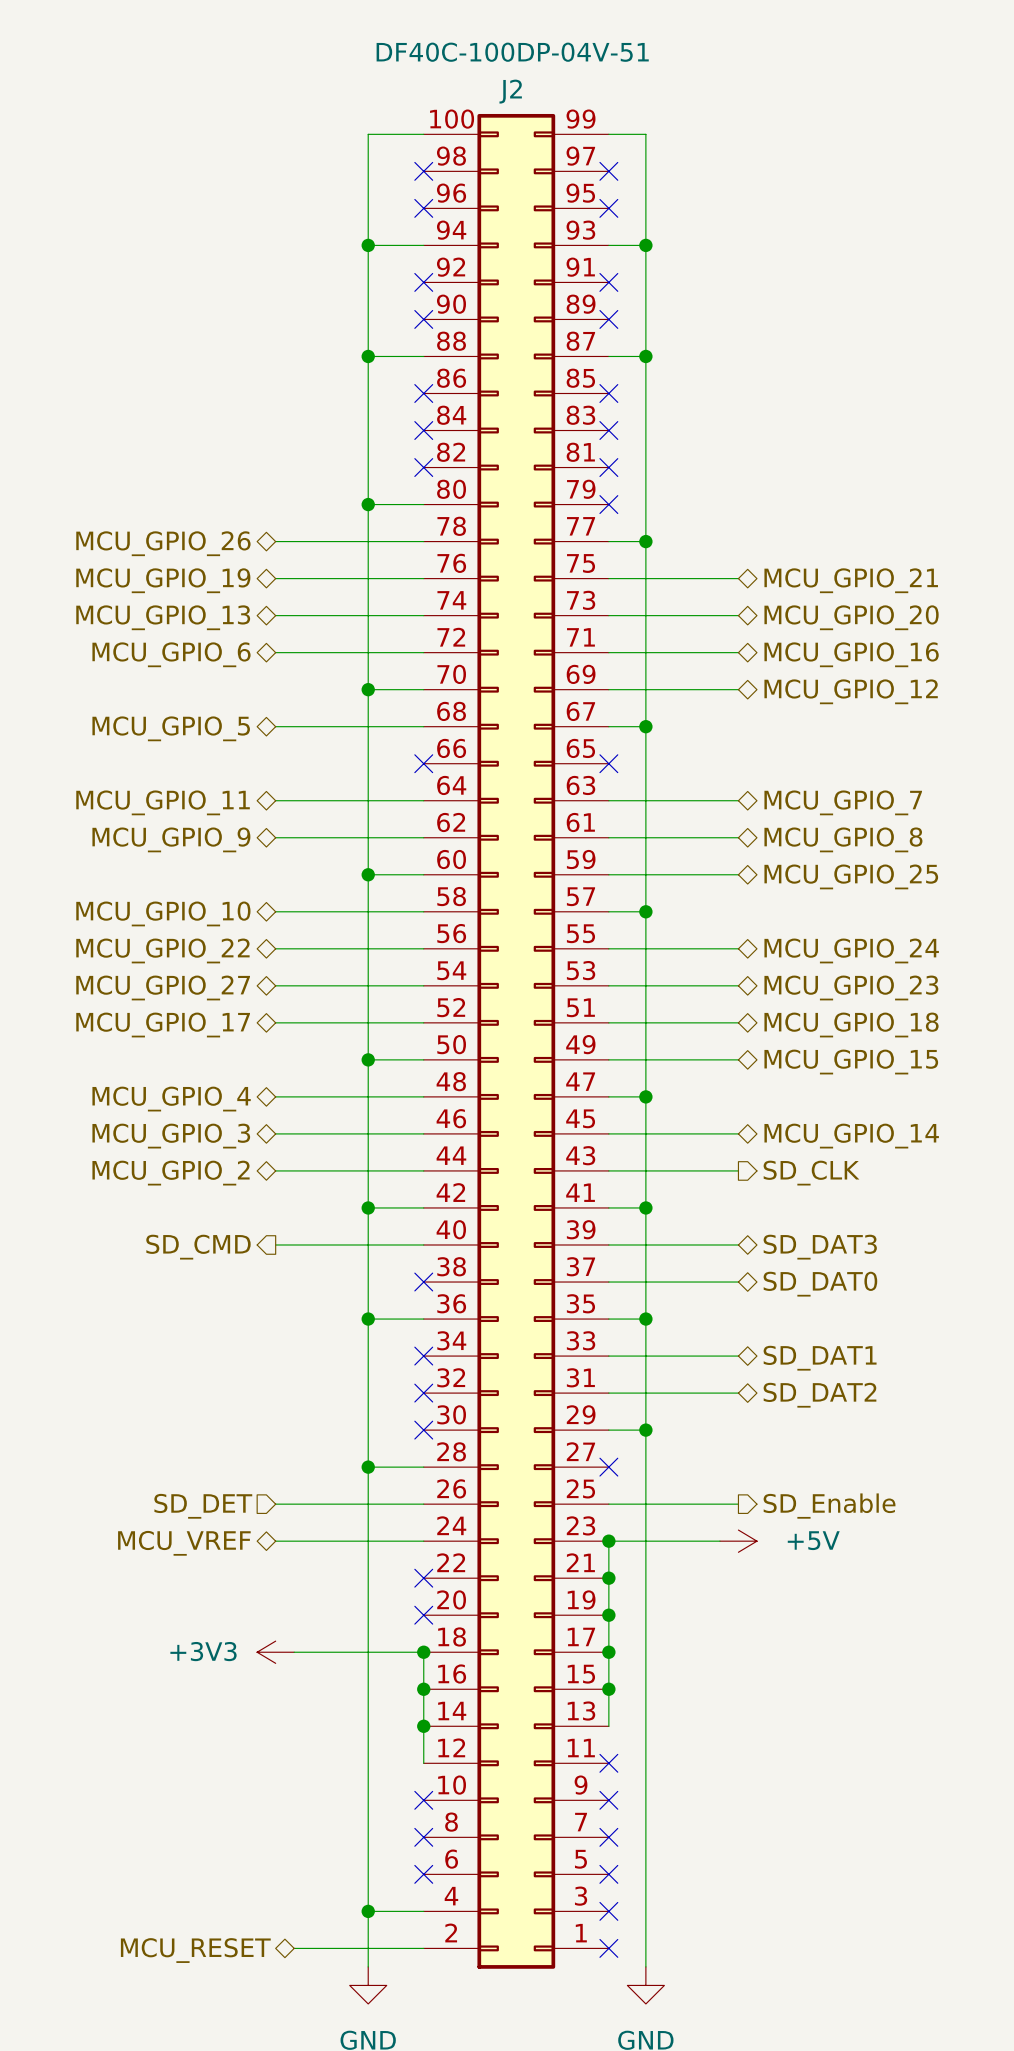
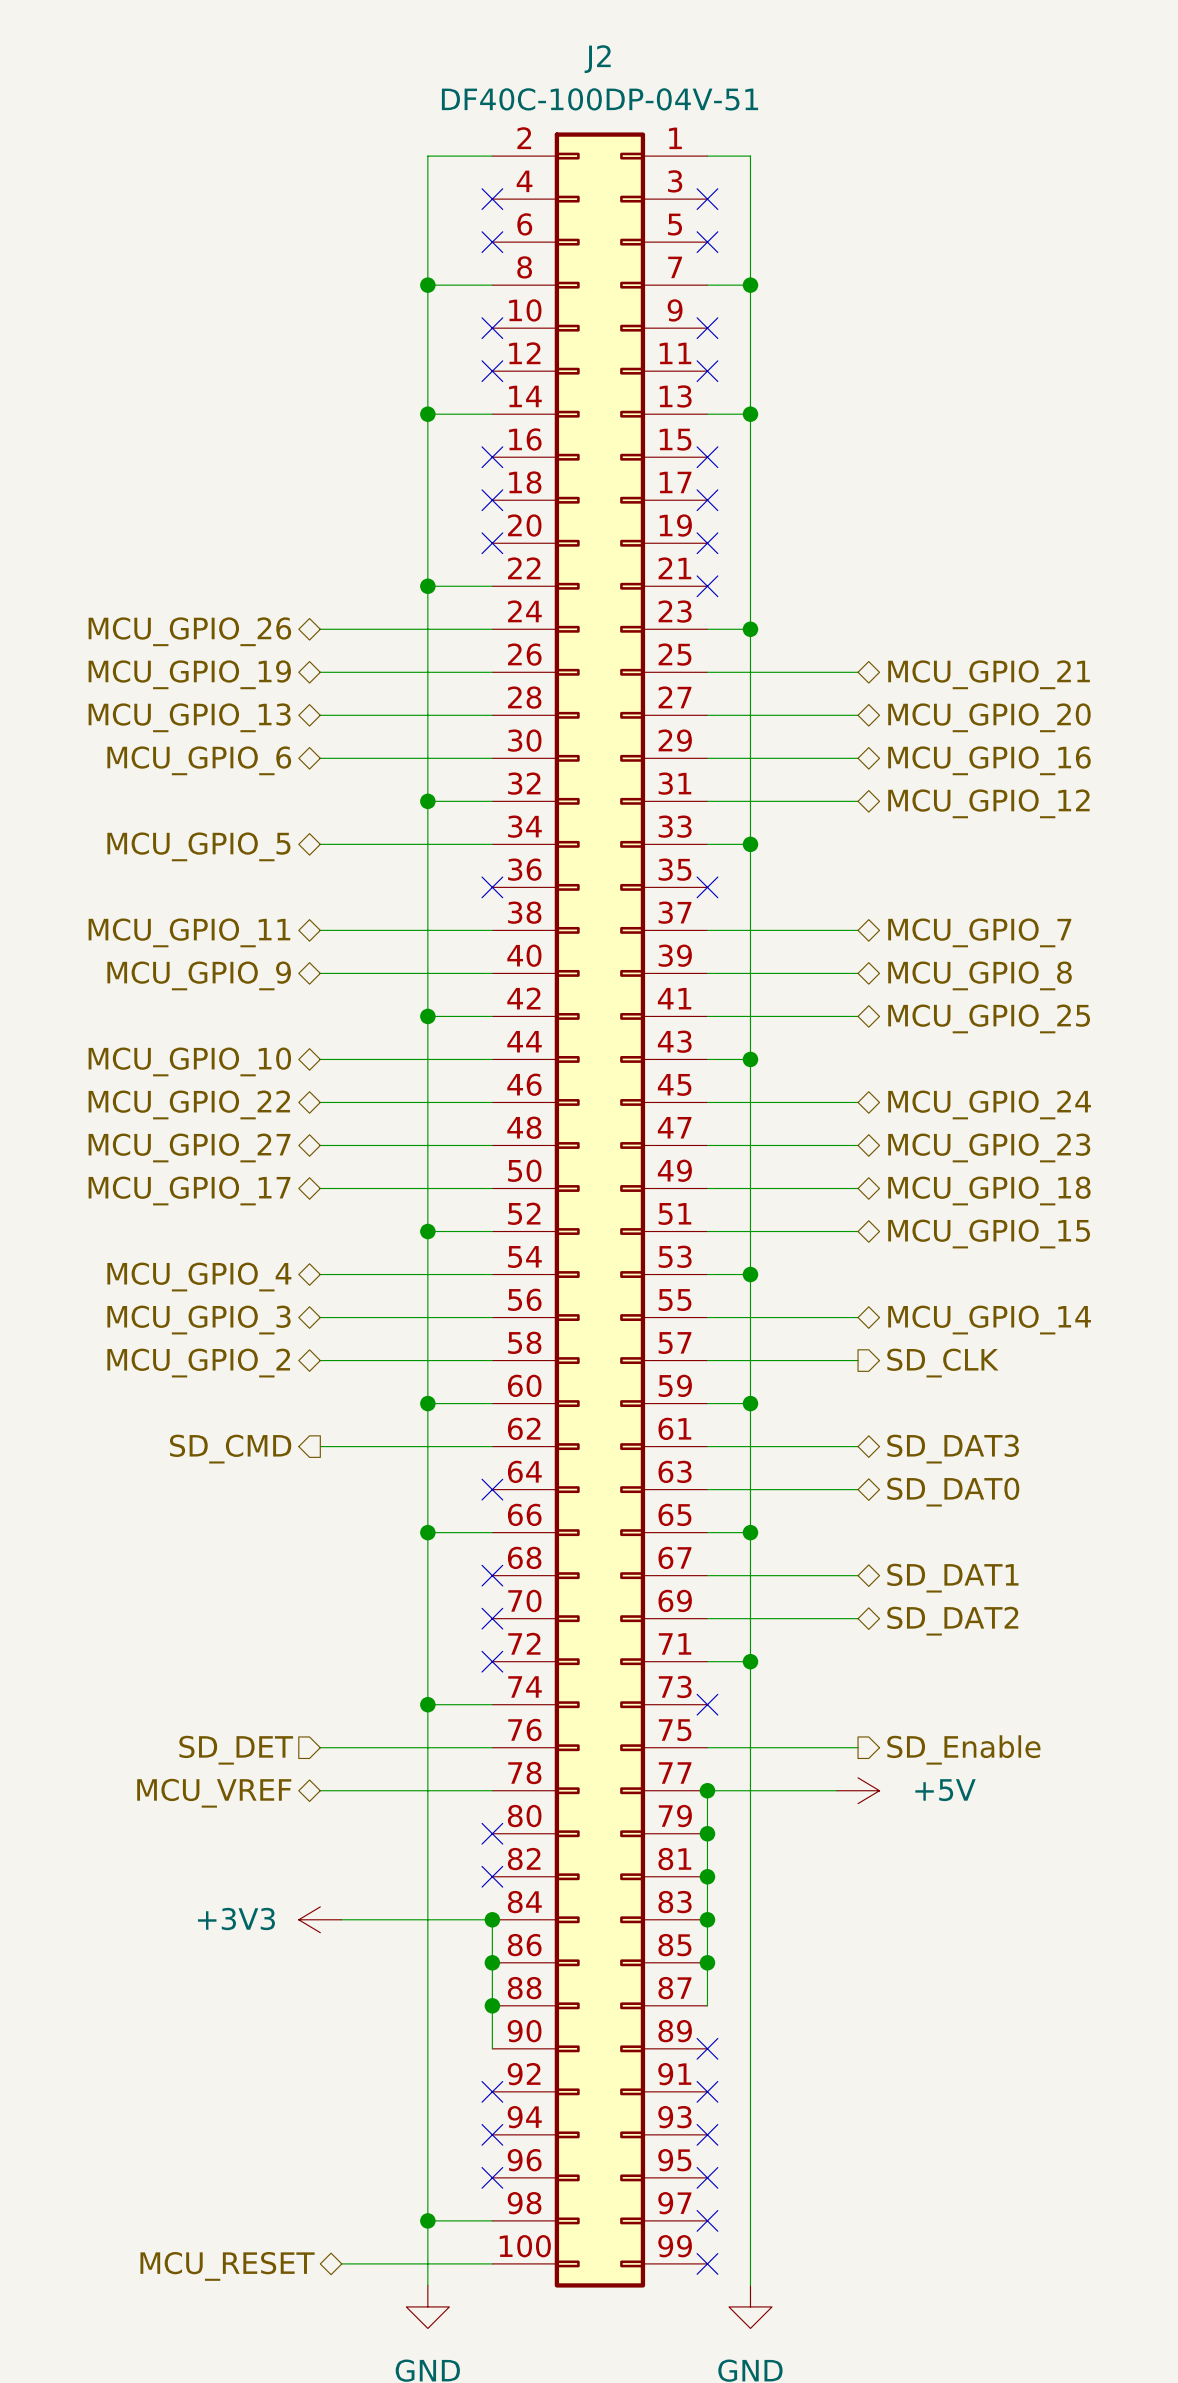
J2 value position: DF40C-100DP-04V-51 (512, 52) -> DF40C-100DP-04V-51 (600, 99)
J2 name position: J2 (510, 91) -> J2 (597, 59)
J2 flip: as is (516, 1041) -> up-down (599, 1210)

